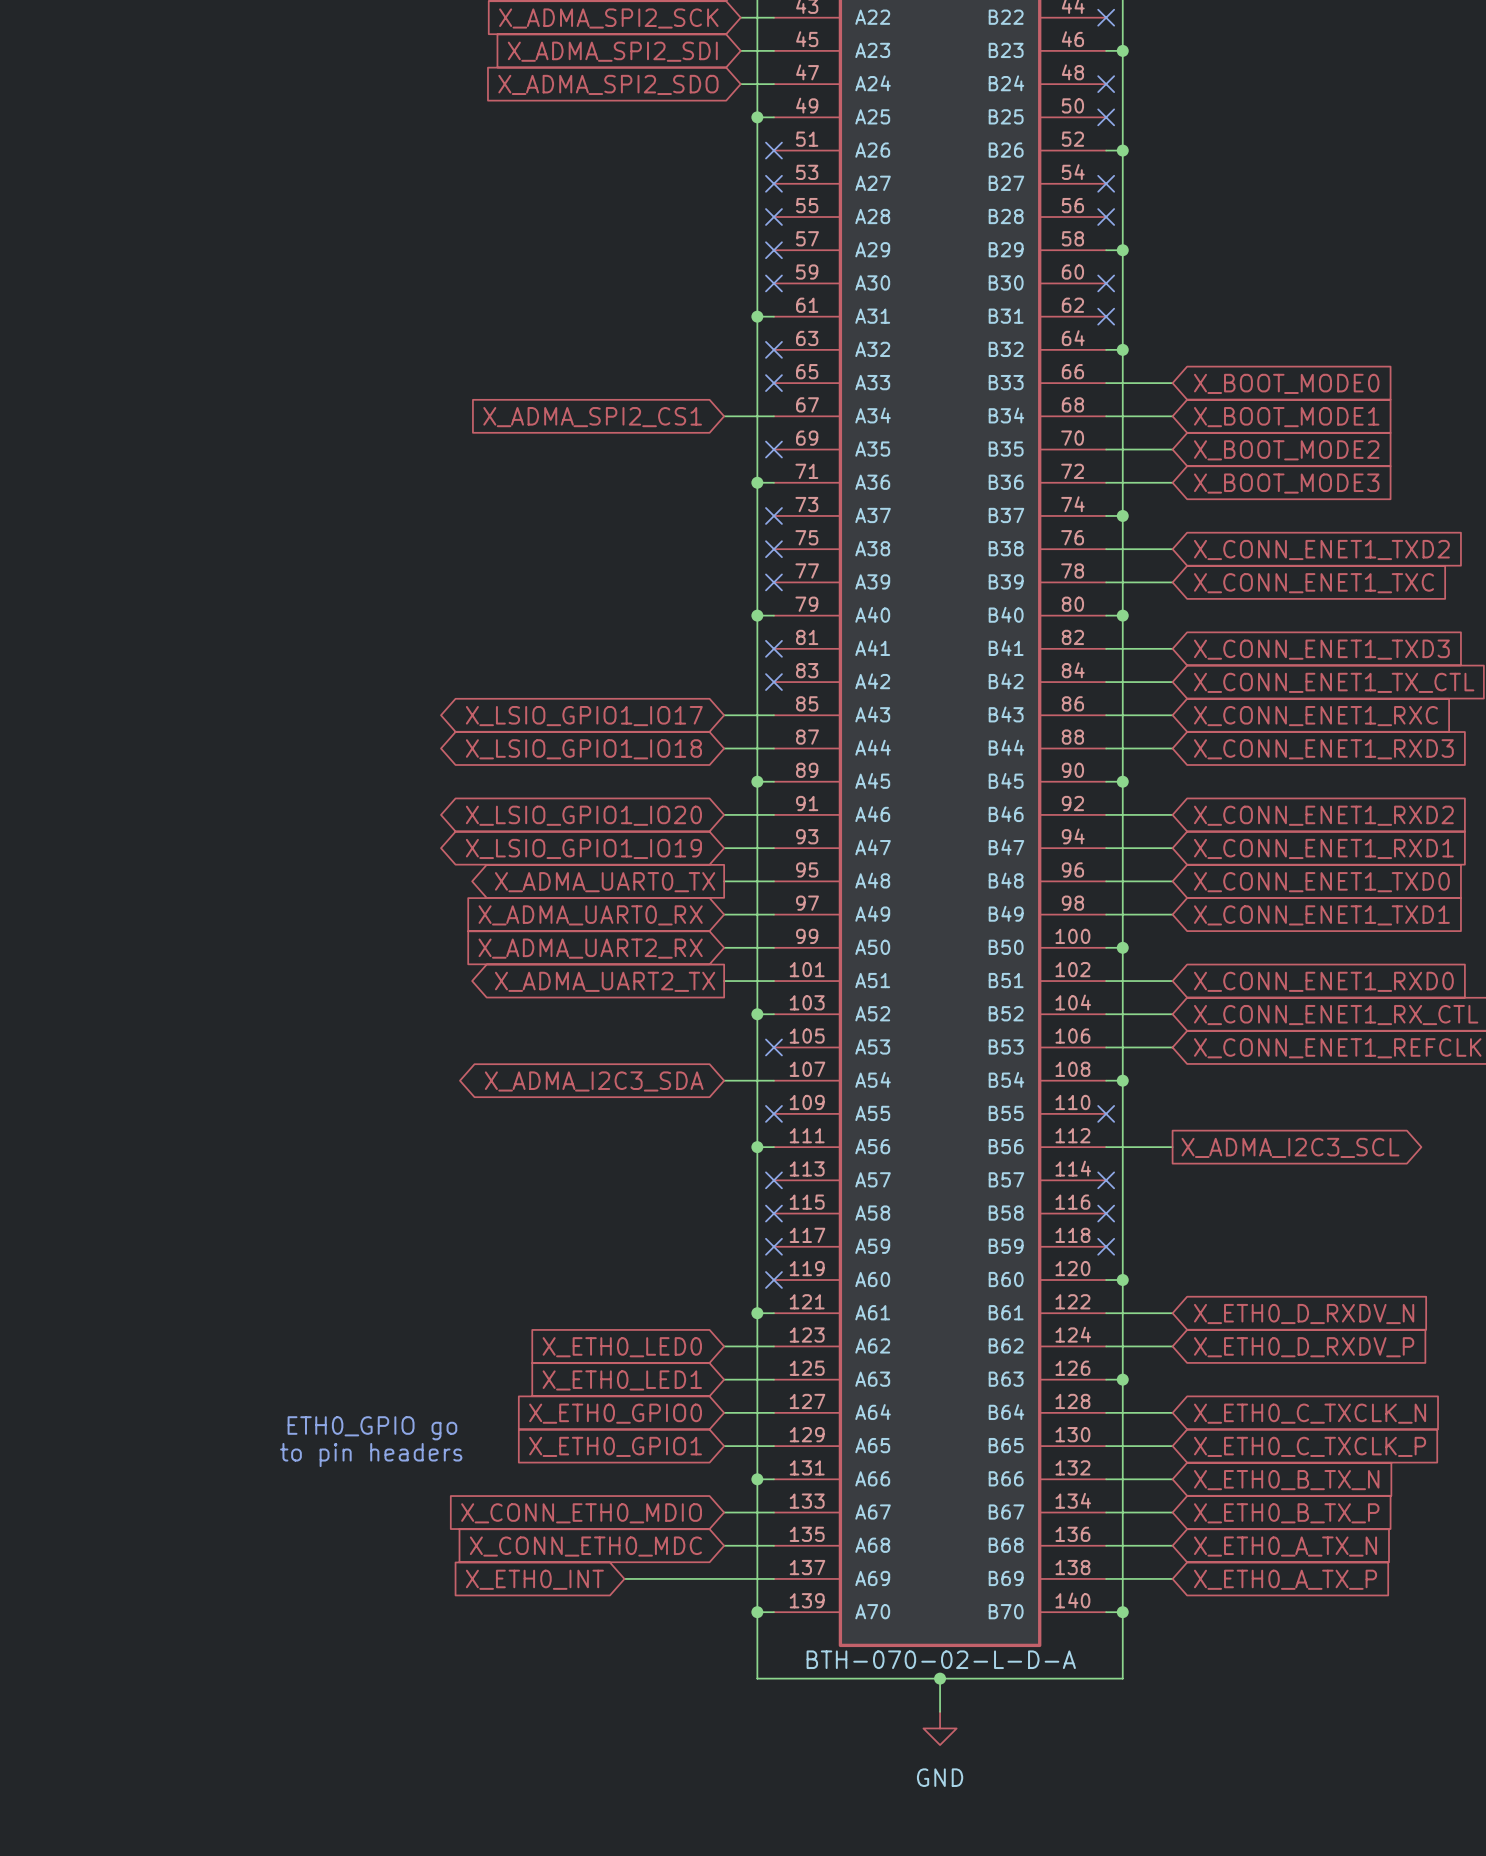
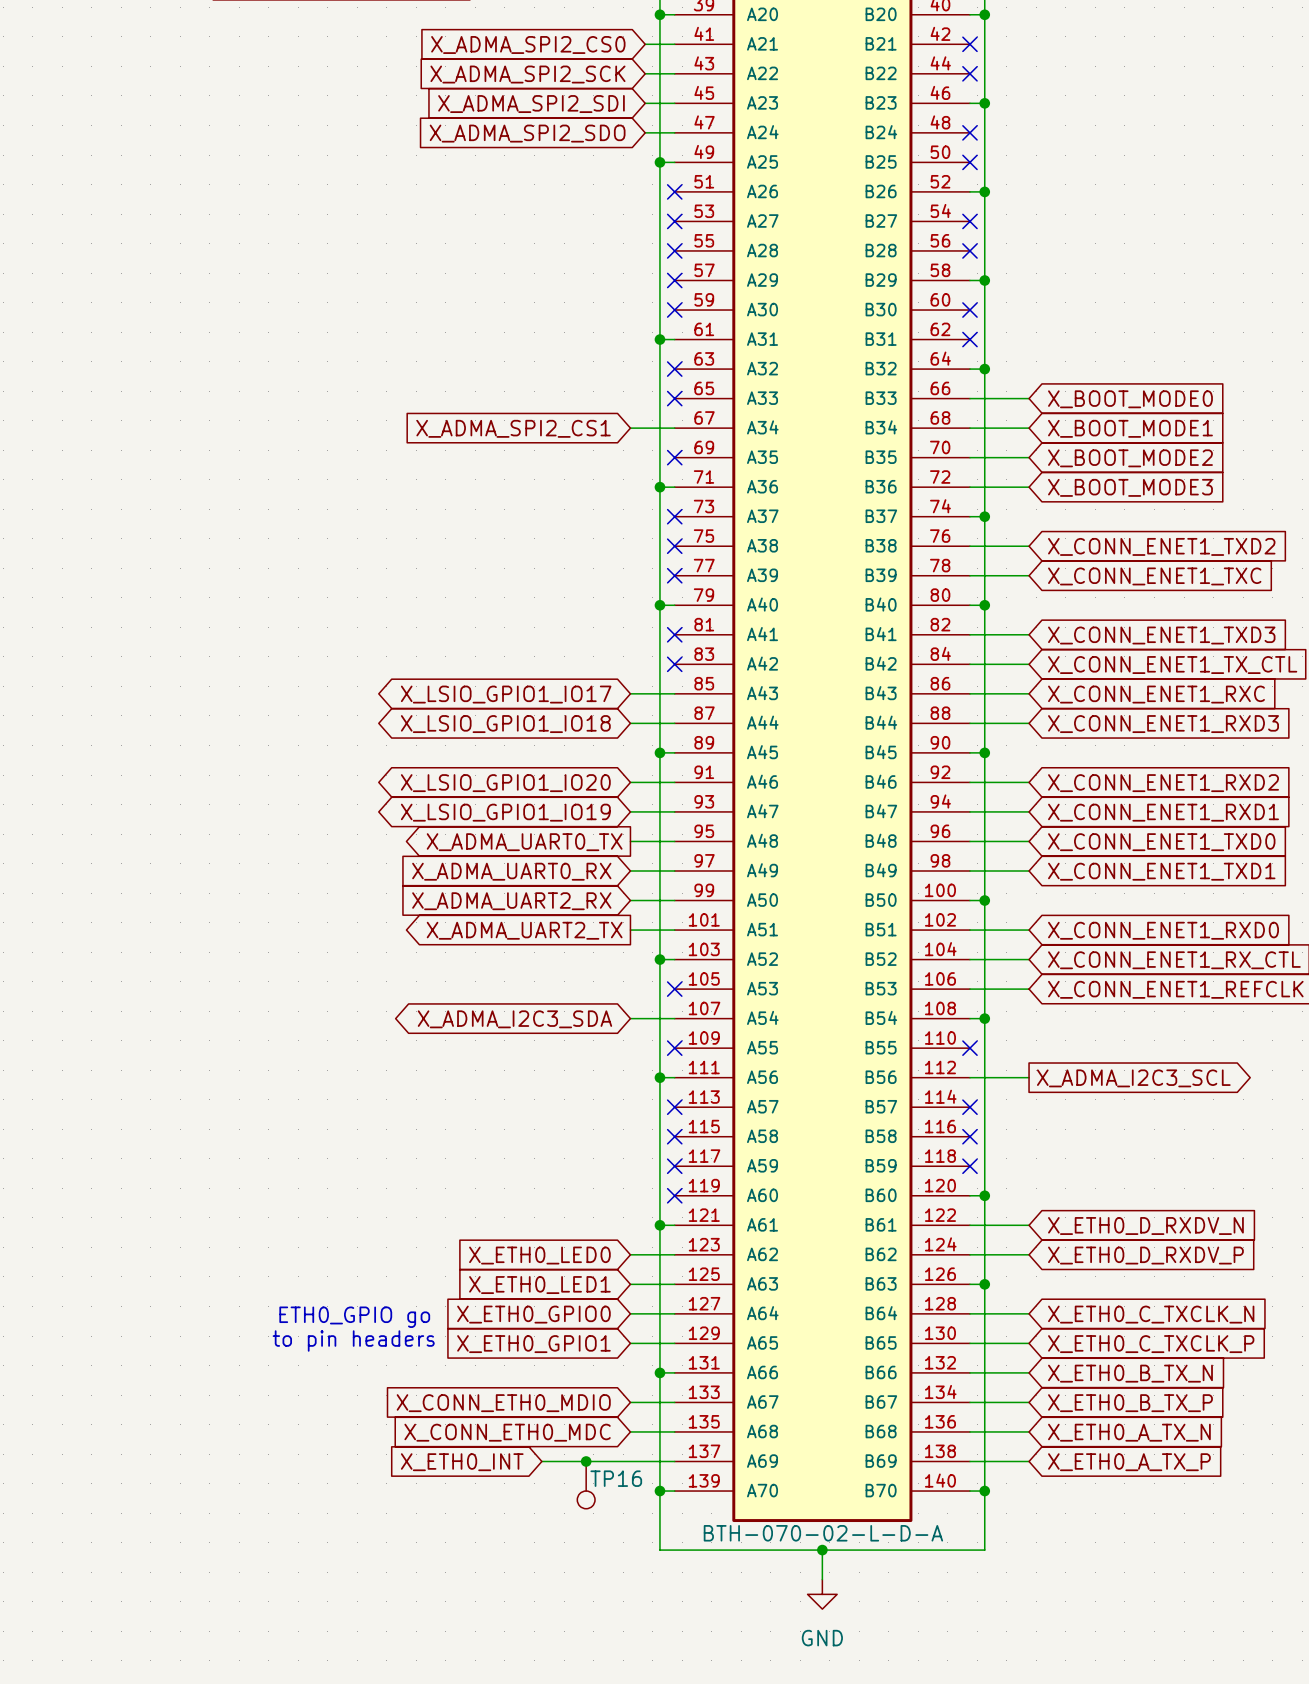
text position: ETH0_GPIO go (372, 1428) -> ETH0_GPIO go (354, 1317)
text position: to pin headers (371, 1455) -> to pin headers (353, 1341)
junction: none -> (586, 1461)
TP16: none -> (586, 1485)

